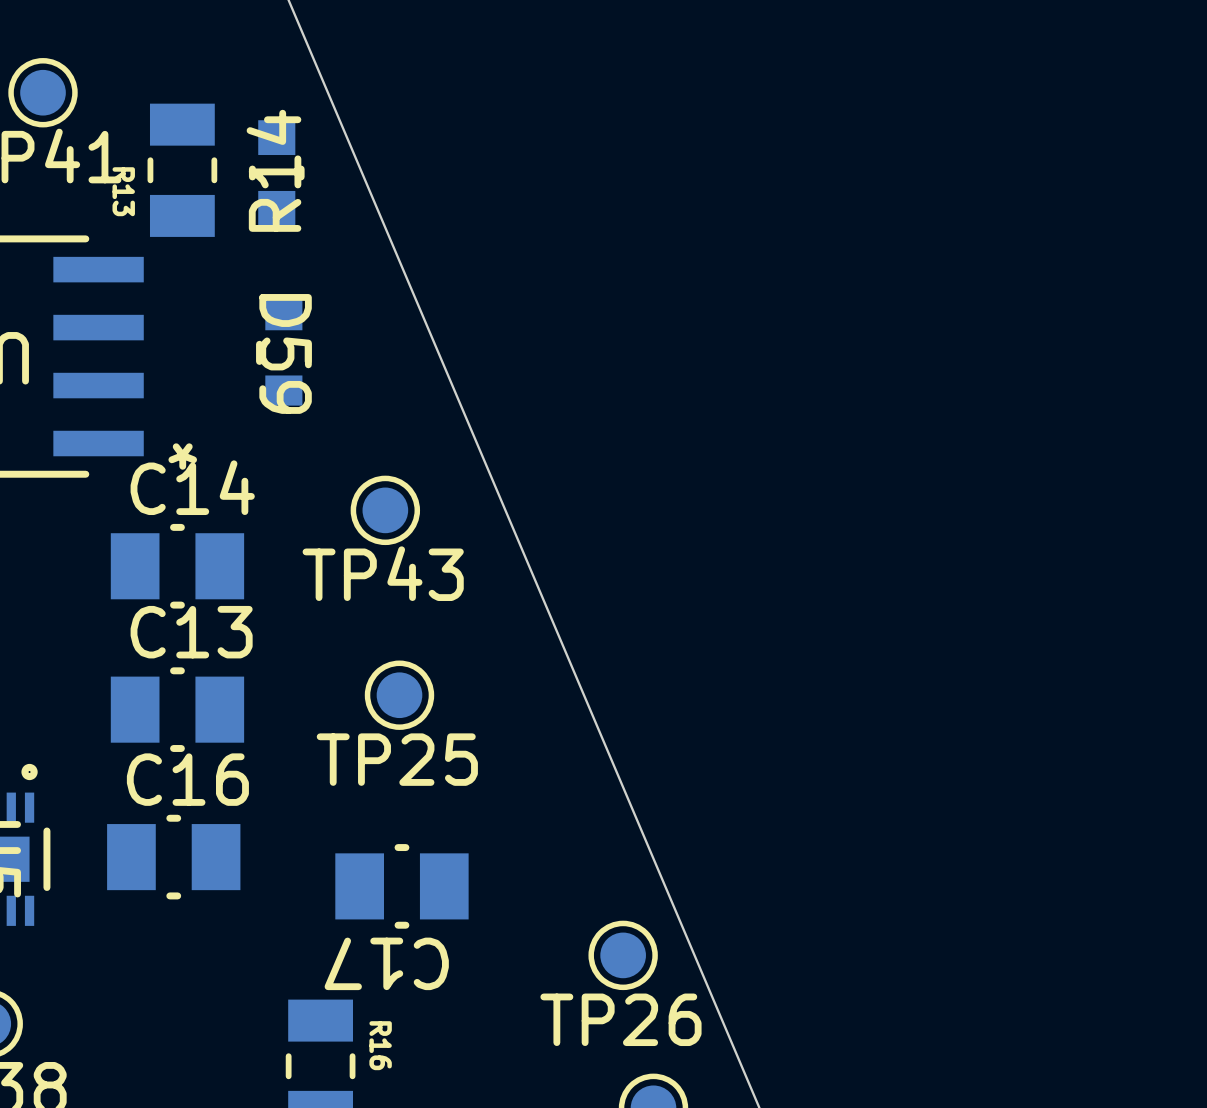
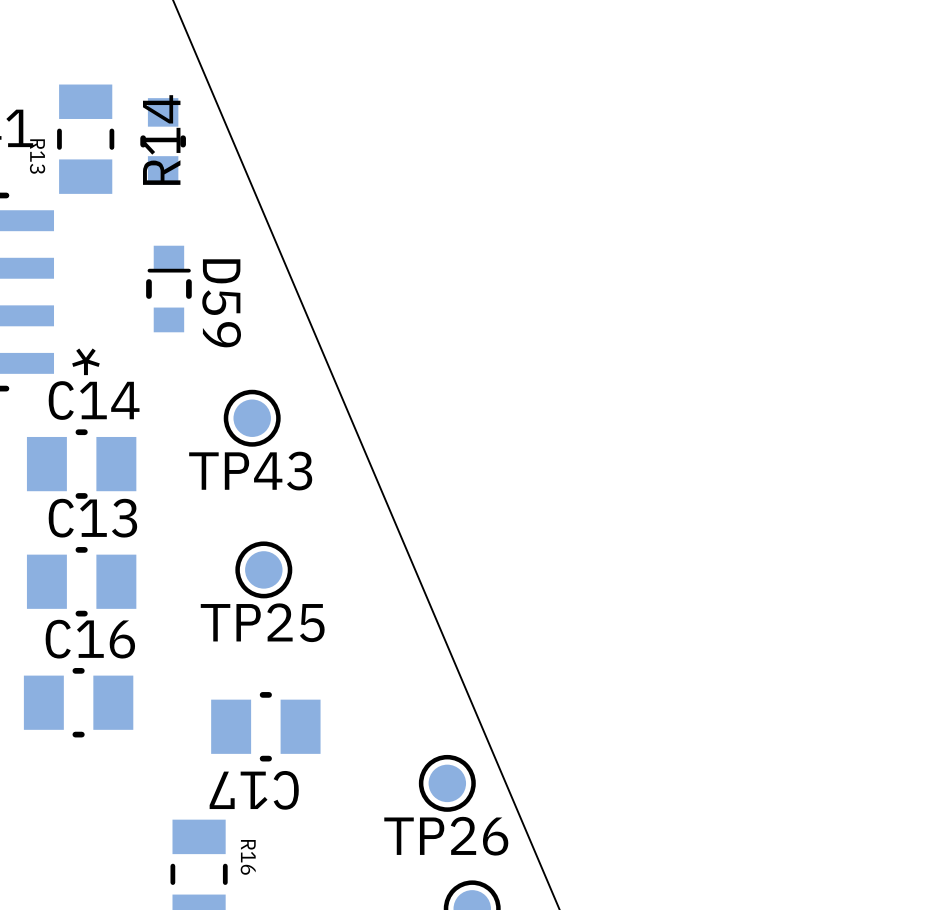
D59 footprint: [256, 300, 312, 406] -> [146, 245, 192, 333]
D59 name position: D59 (285, 353) -> D59 (221, 303)

